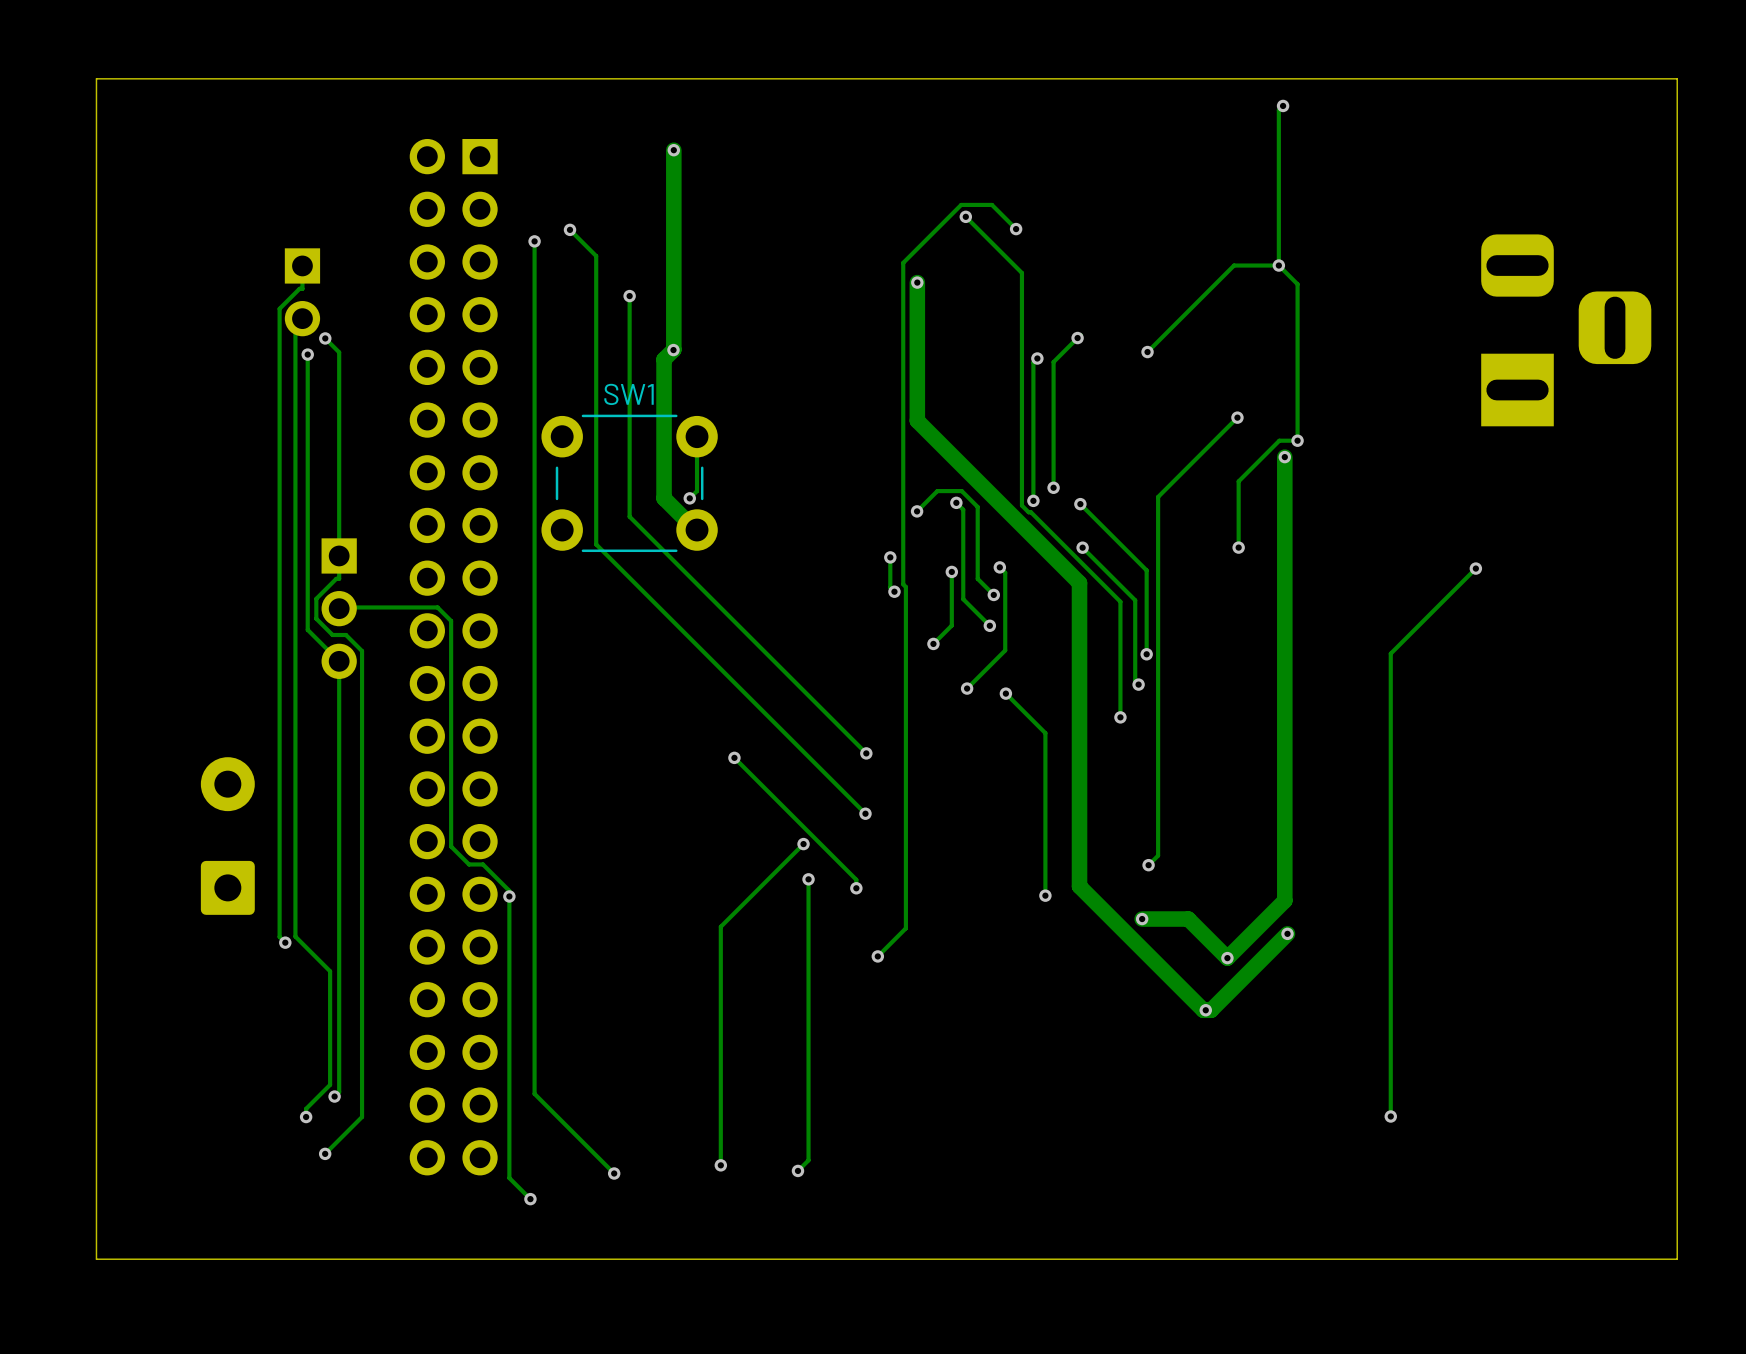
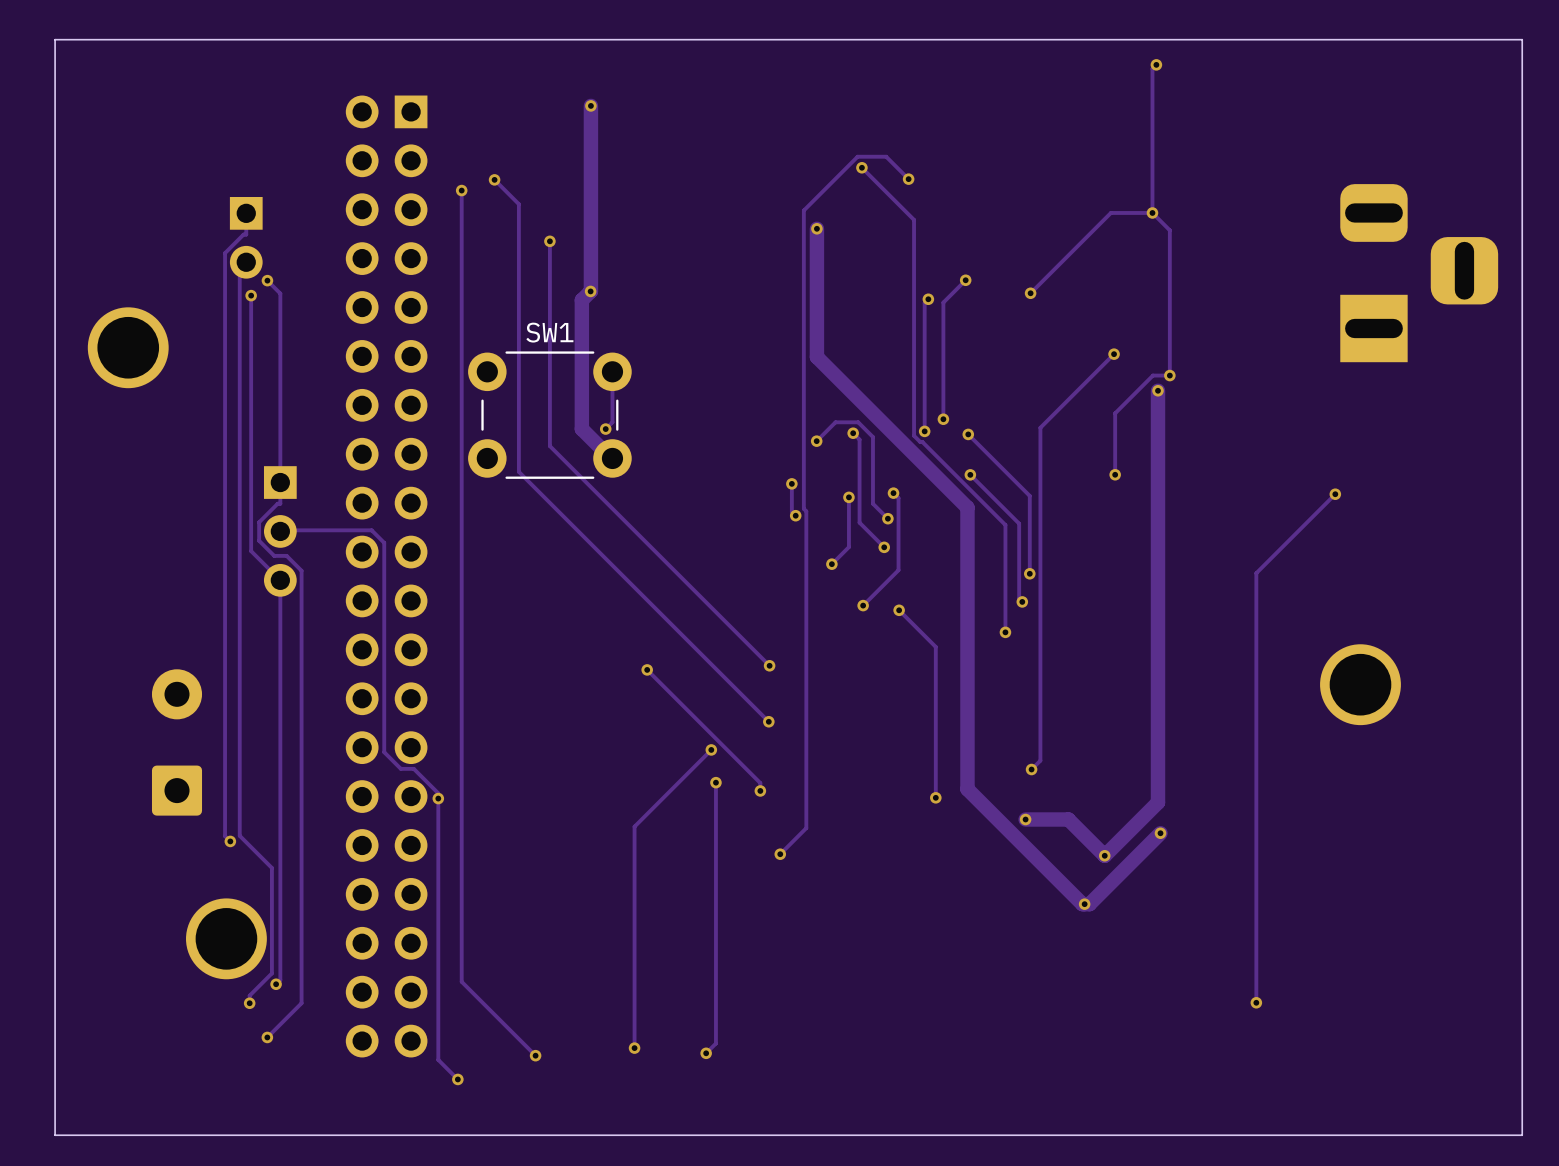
part: none -> (128, 347)
part: none -> (1360, 684)
part: none -> (226, 938)

